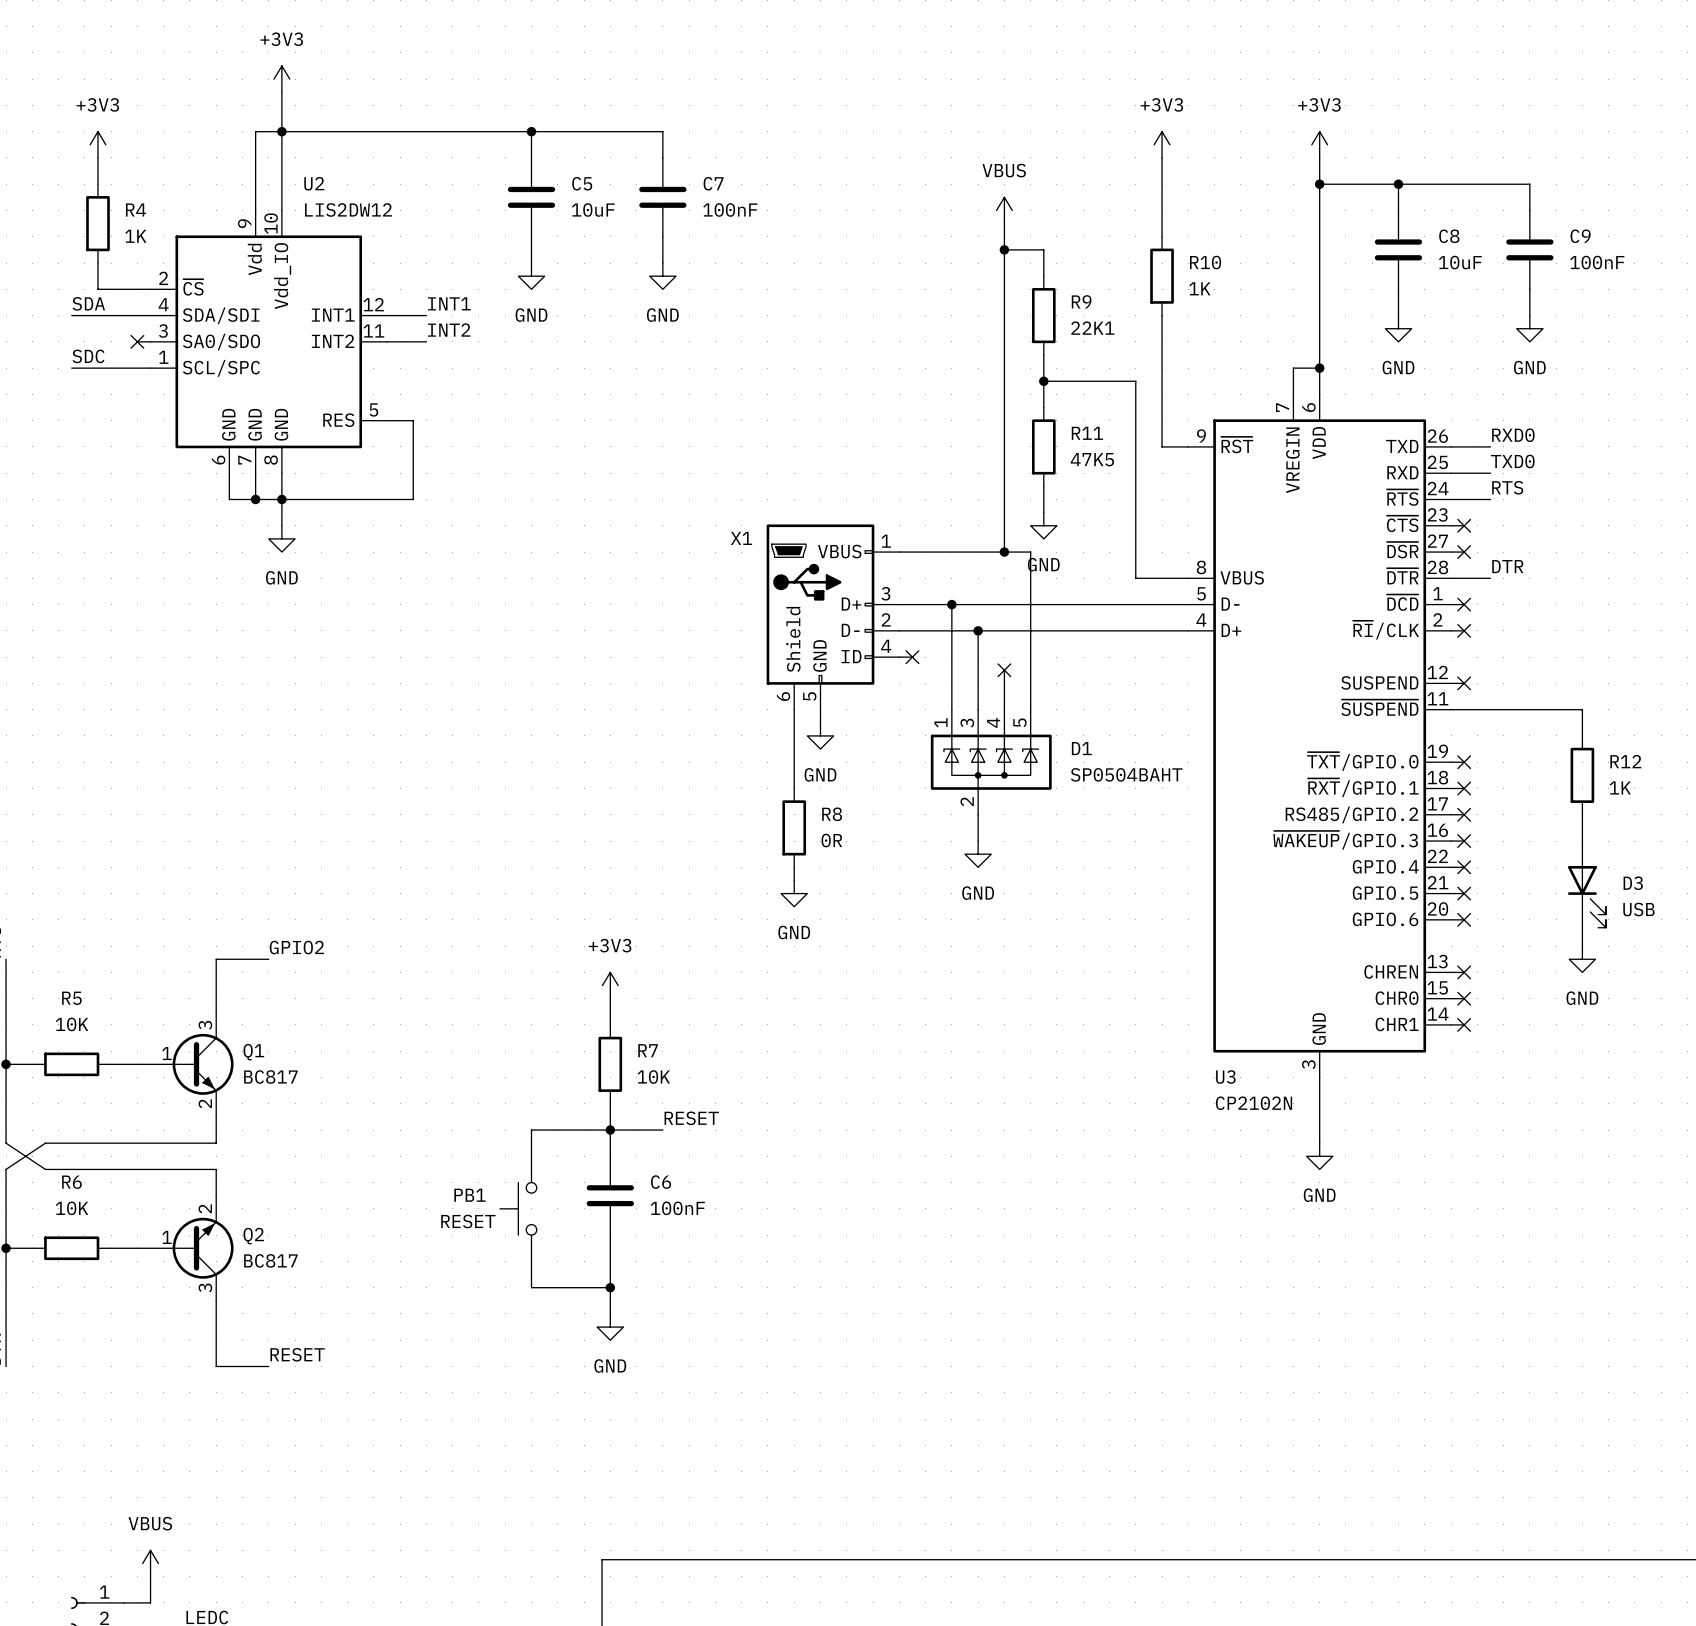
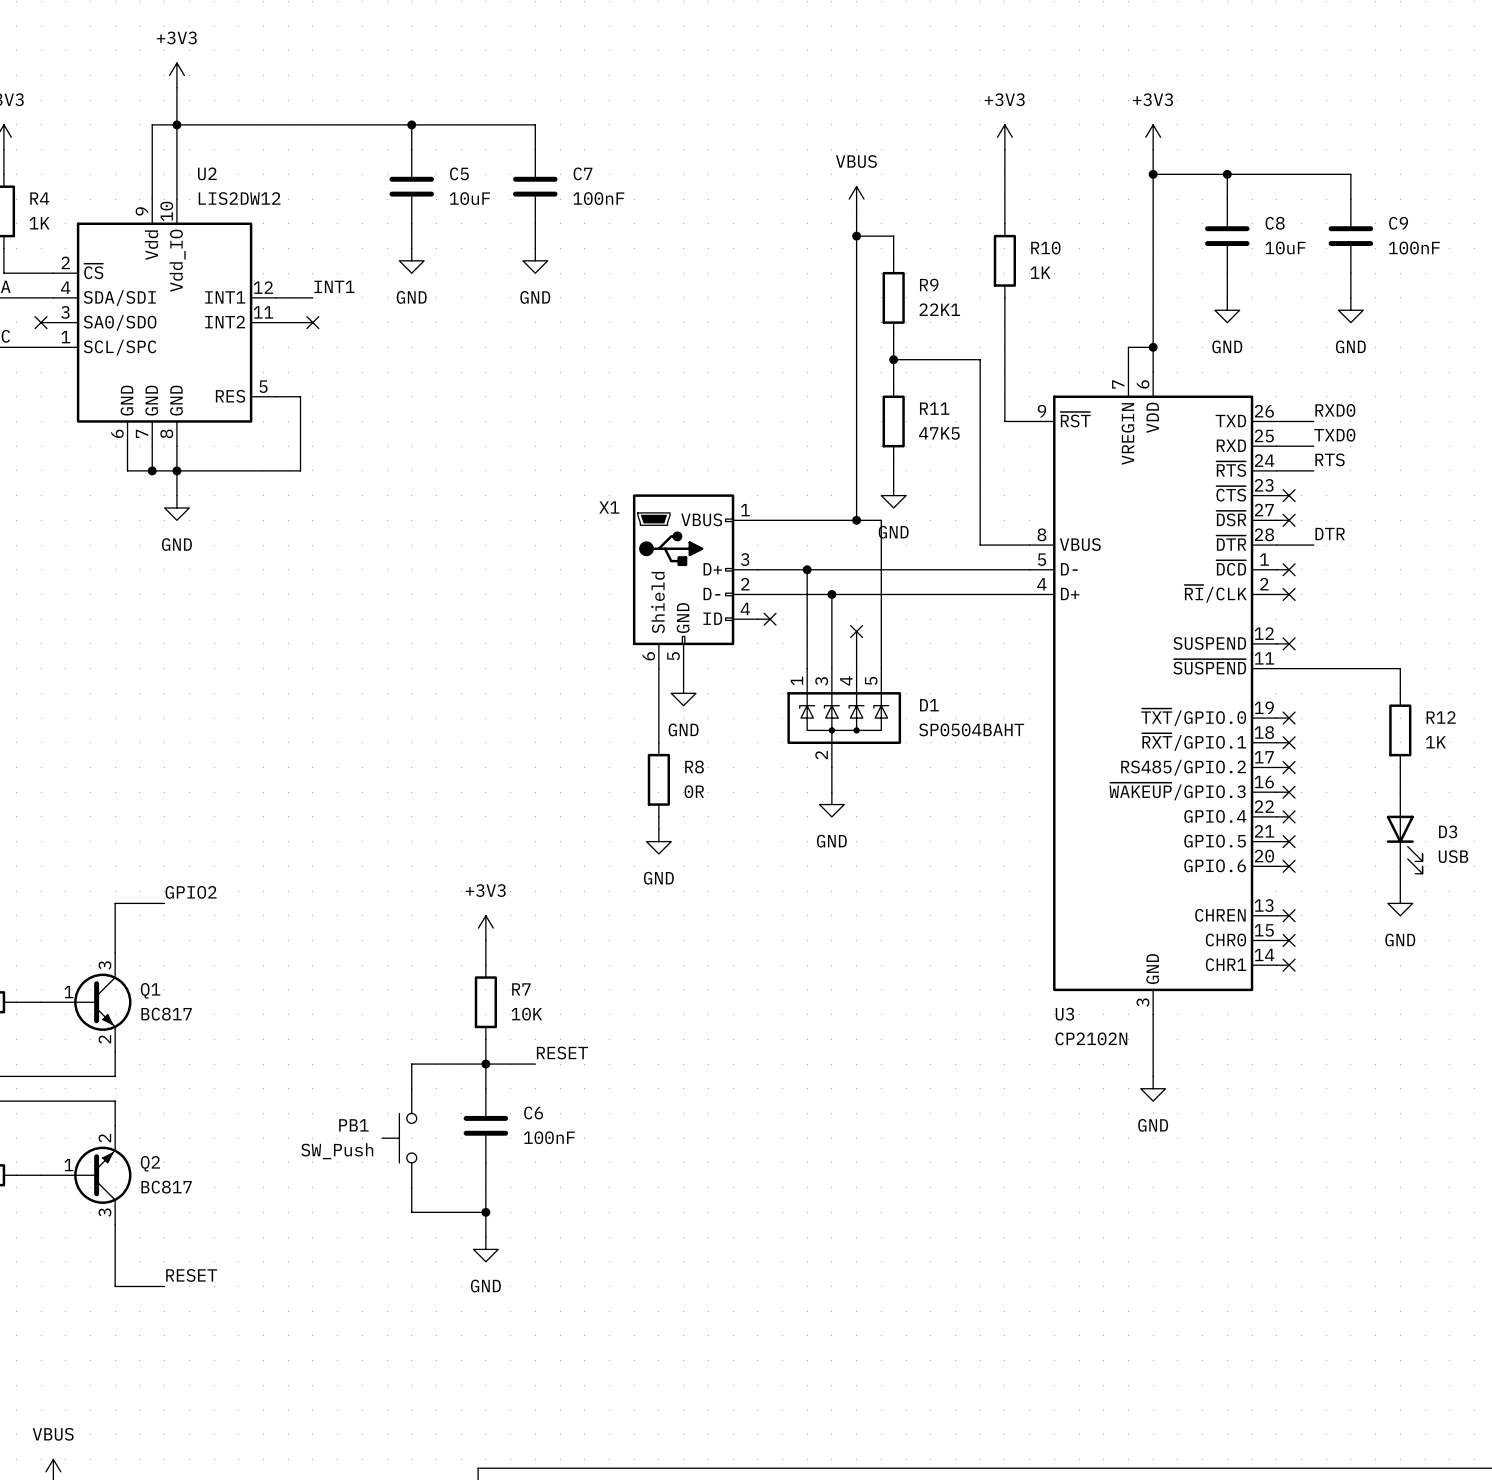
label: INT2 (449, 330) -> none
no-connect mark: none -> (312, 322)
PB1 value: RESET (468, 1221) -> SW_Push (337, 1151)

